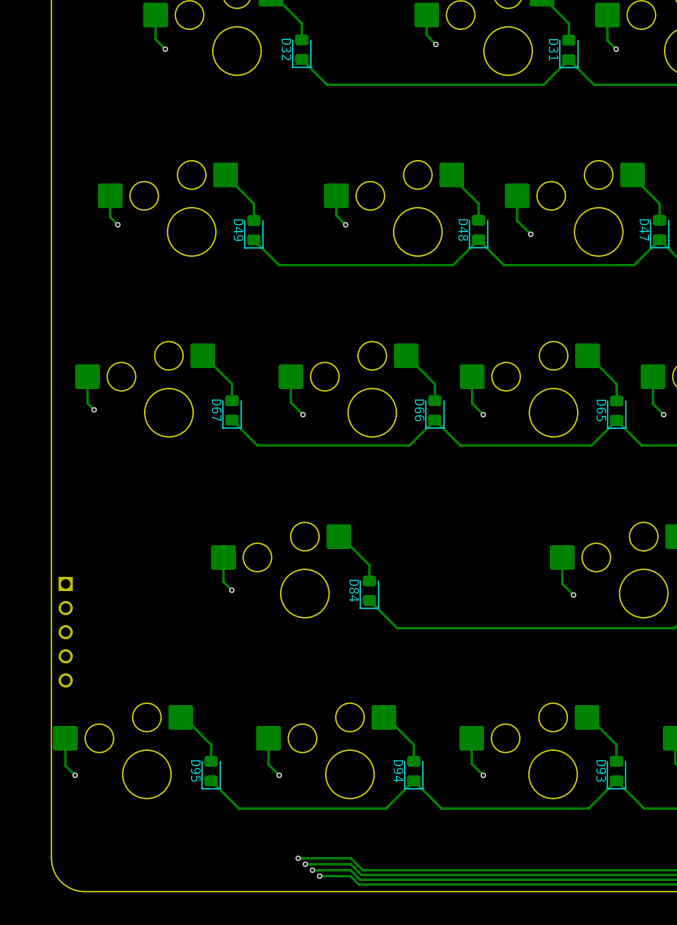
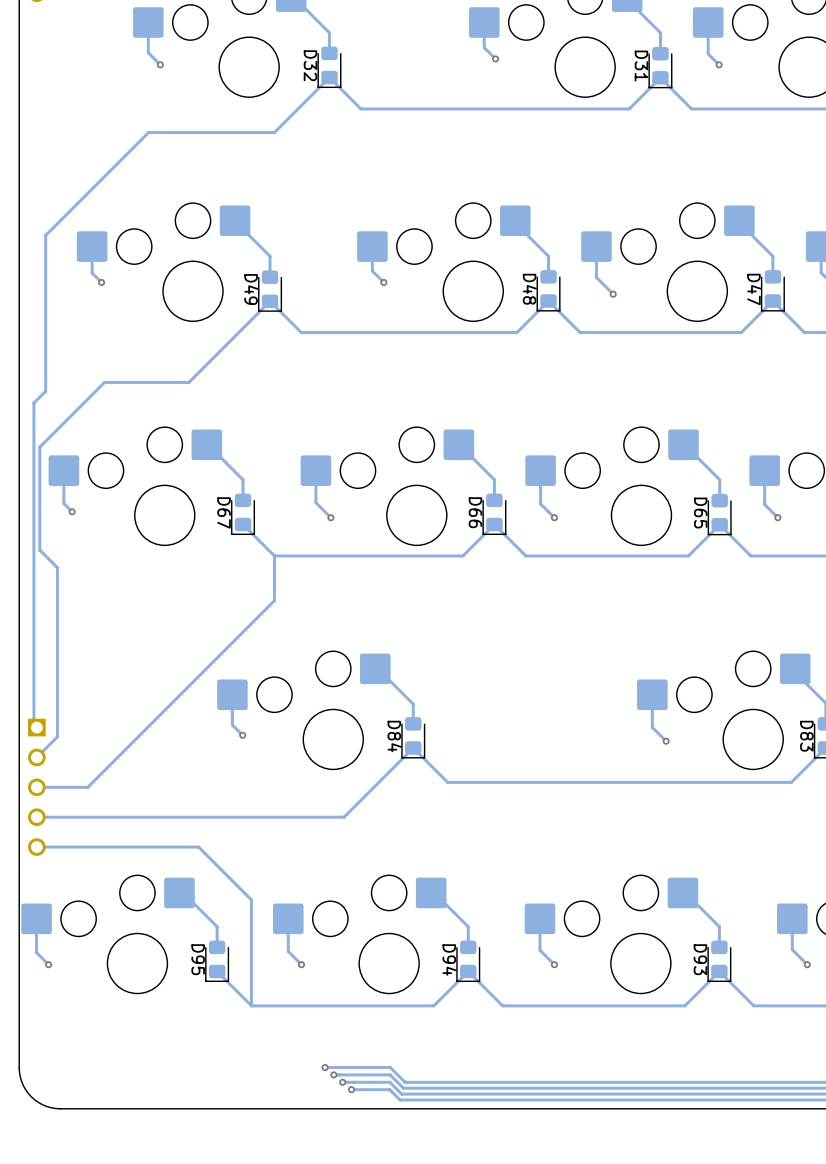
track: none -> (329, 77) (274, 132) (148, 132) (45, 235) (45, 391) (33, 403) (33, 724) (36, 727)
track: none -> (270, 301) (188, 382) (104, 382) (39, 447) (39, 550) (57, 567) (57, 736) (36, 757)
track: none -> (274, 555) (274, 600) (87, 787) (36, 787)
track: none -> (413, 747) (344, 817) (36, 817)
track: none -> (36, 847) (198, 847) (251, 900) (251, 1005)

